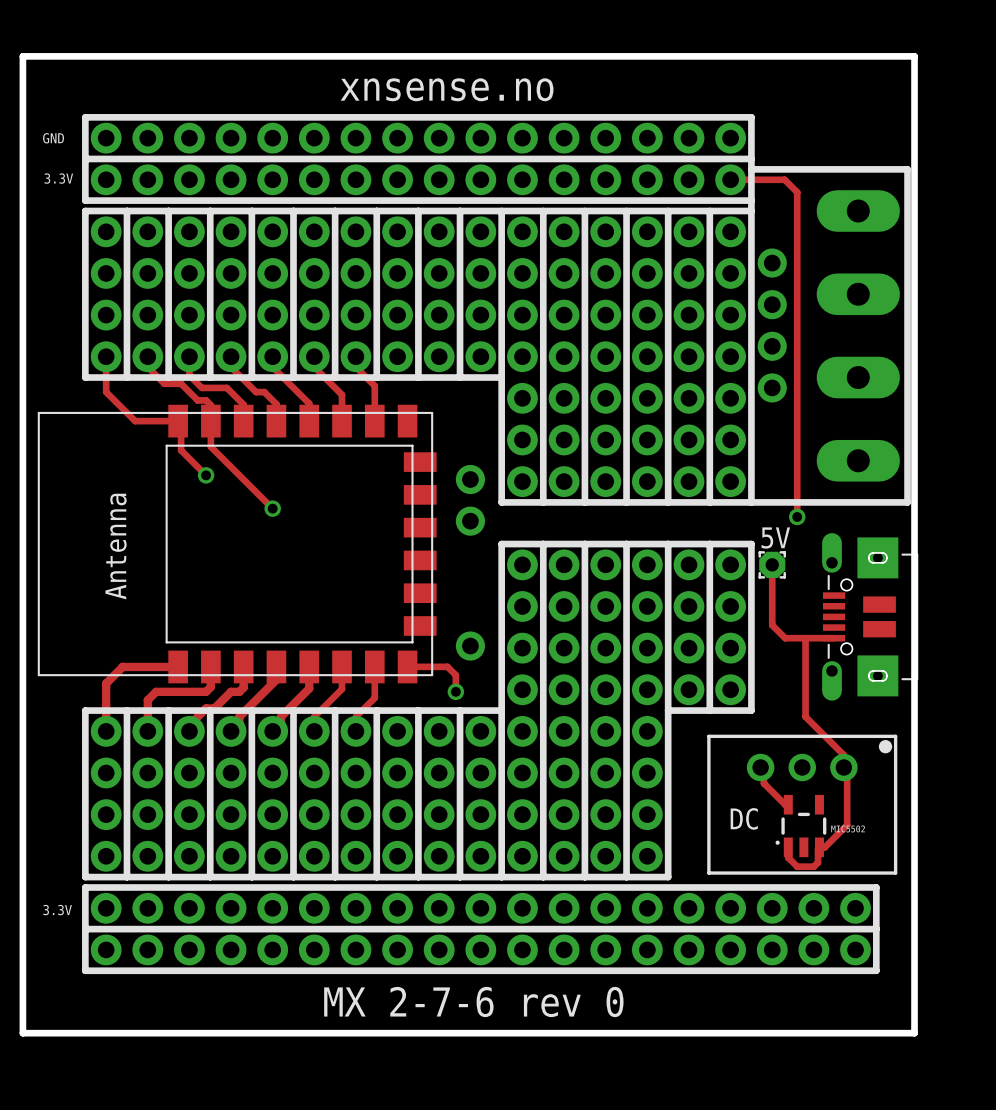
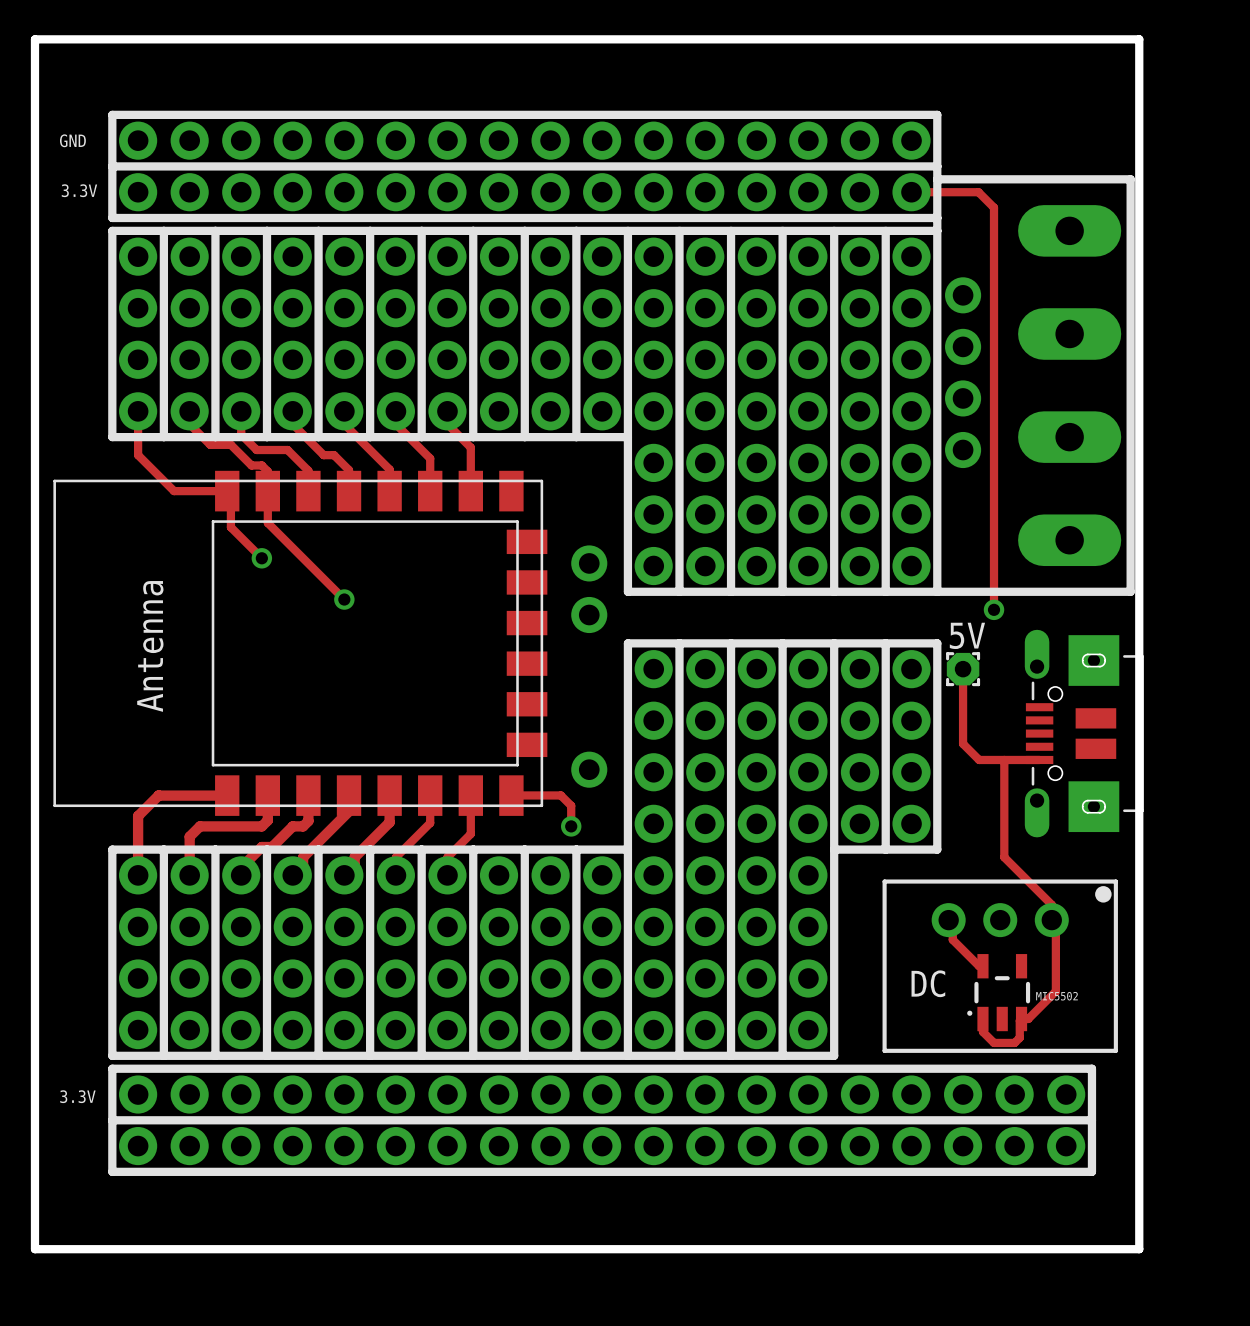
text: xnsense.no (447, 89) -> none
text: MX 2-7-6 rev 0 (473, 1001) -> none

